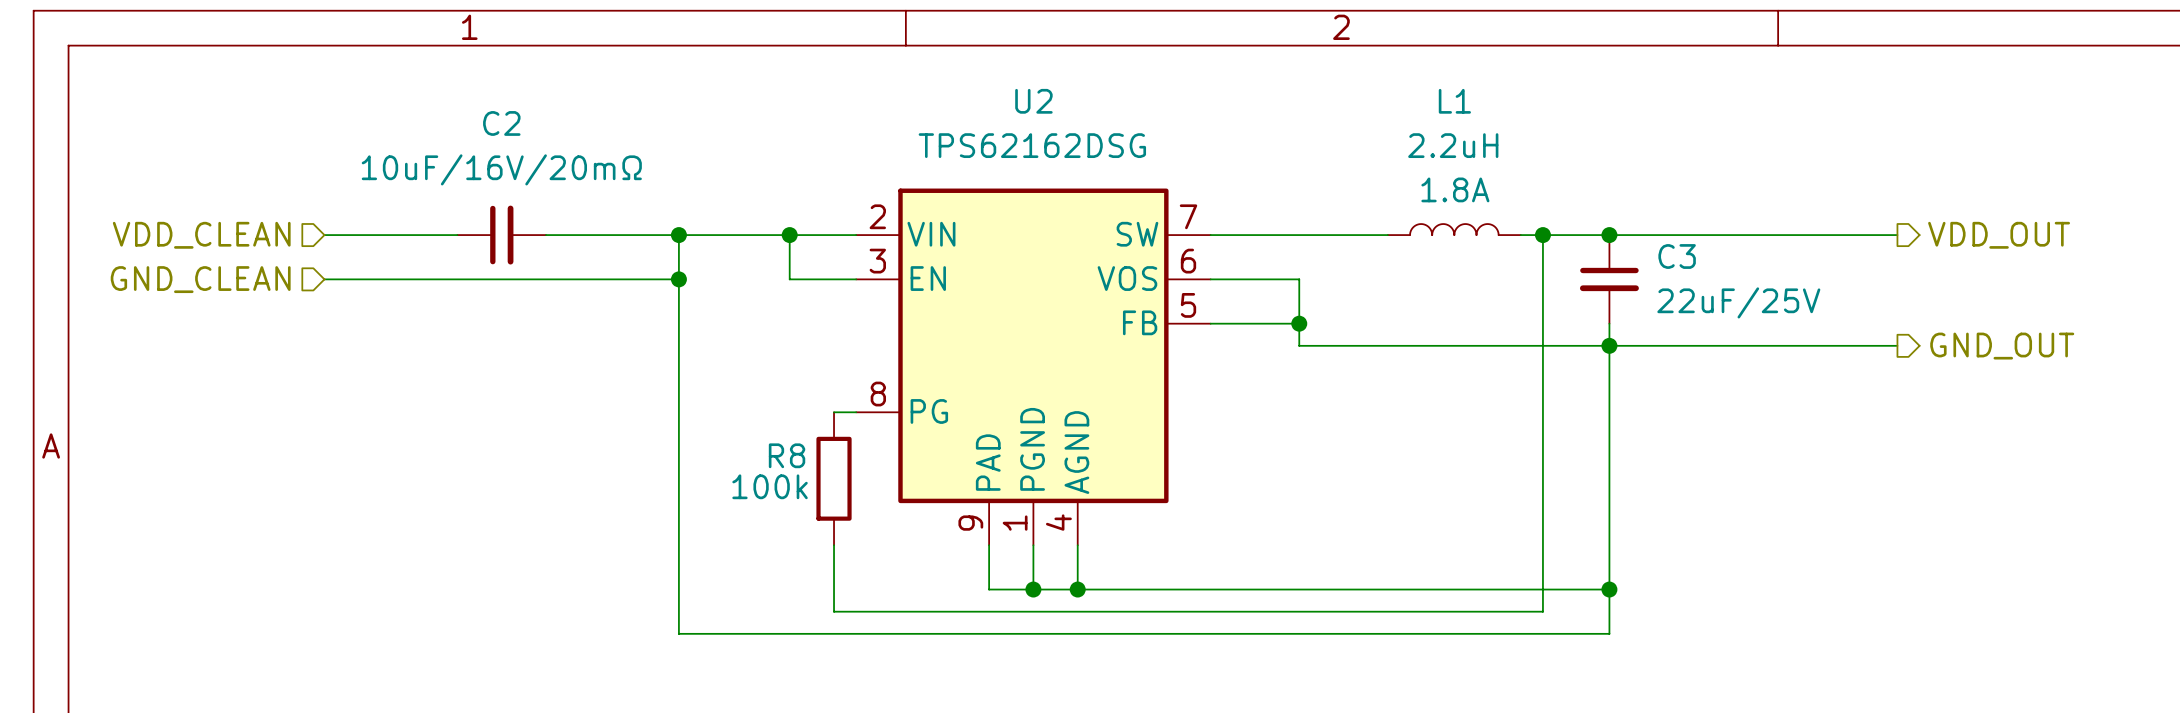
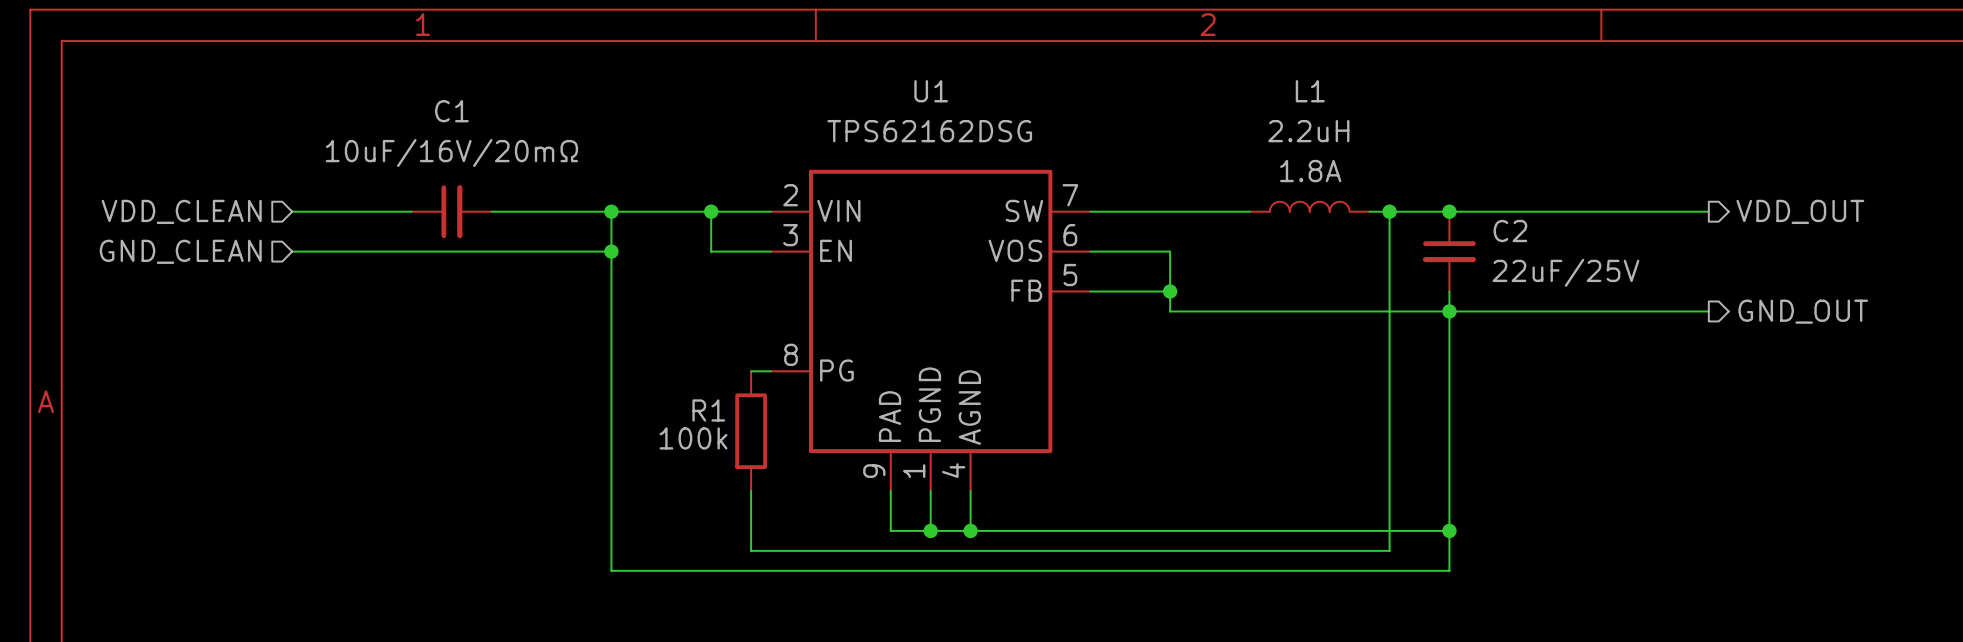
U2 name: U2 (1033, 101) -> U1 (931, 91)
C2 name: C2 (501, 123) -> C1 (451, 111)
C3 name: C3 (1677, 256) -> C2 (1510, 231)
R8 name: R8 (787, 455) -> R1 (708, 410)

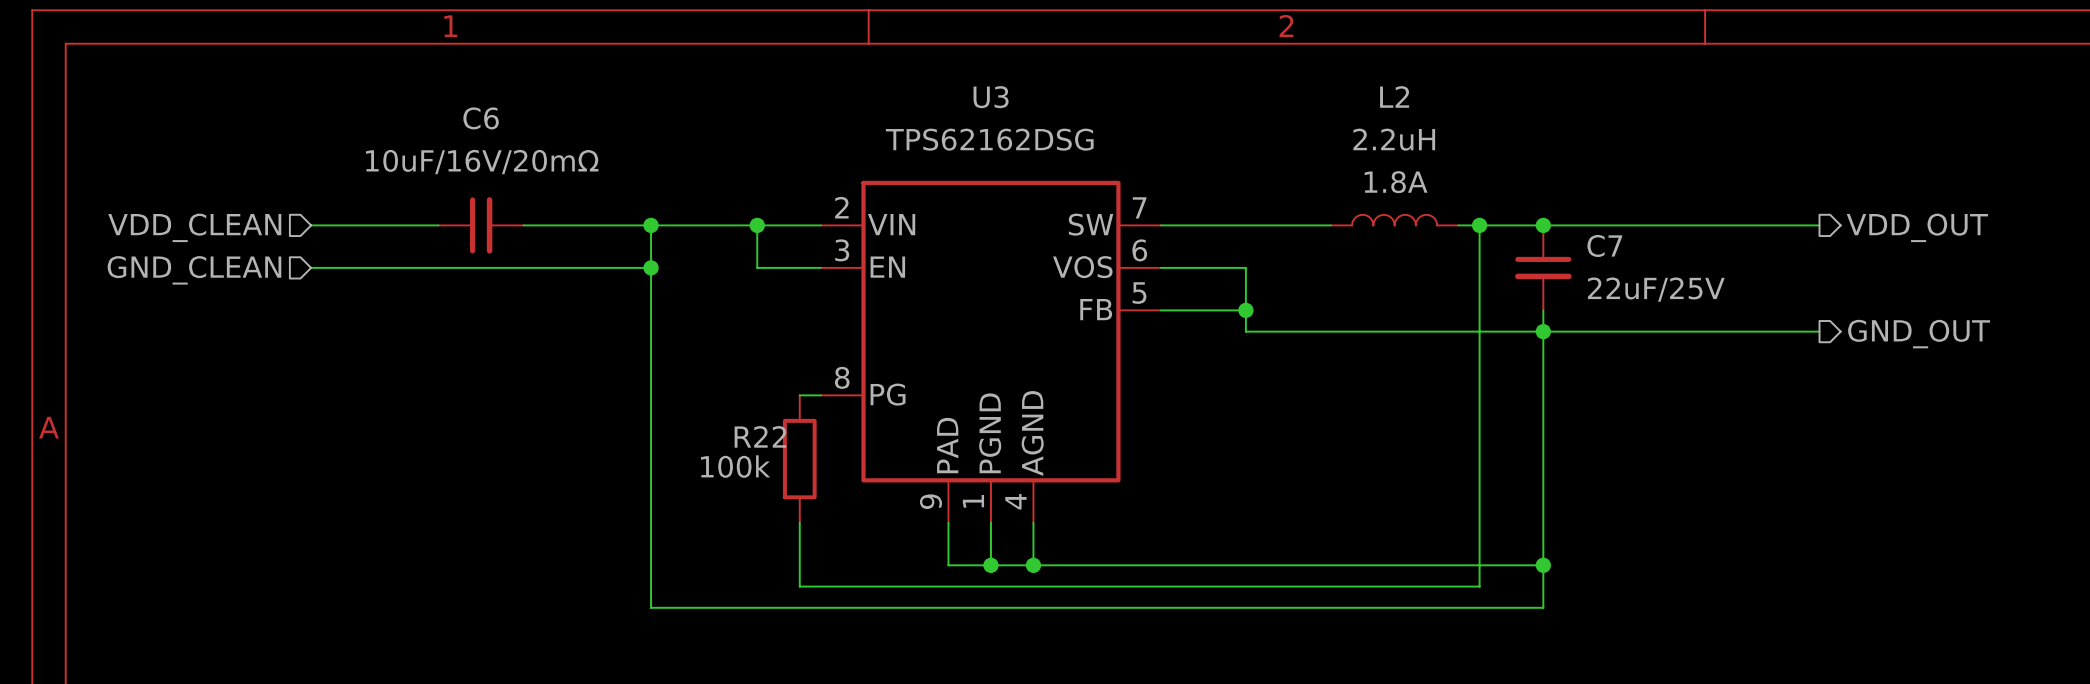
U1 name: U1 (931, 91) -> U3 (991, 97)
L1 name: L1 (1310, 91) -> L2 (1394, 96)
C1 name: C1 (451, 111) -> C6 (481, 118)
C2 name: C2 (1510, 231) -> C7 (1604, 245)
R1 name: R1 (708, 410) -> R22 (760, 436)

